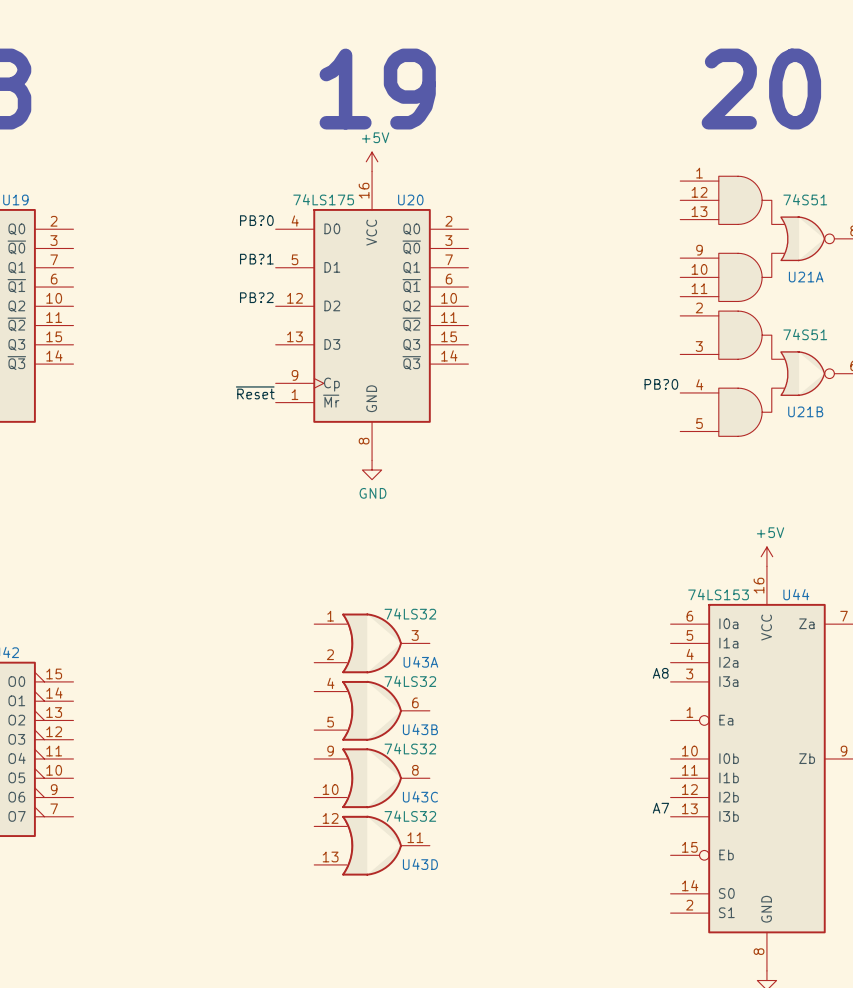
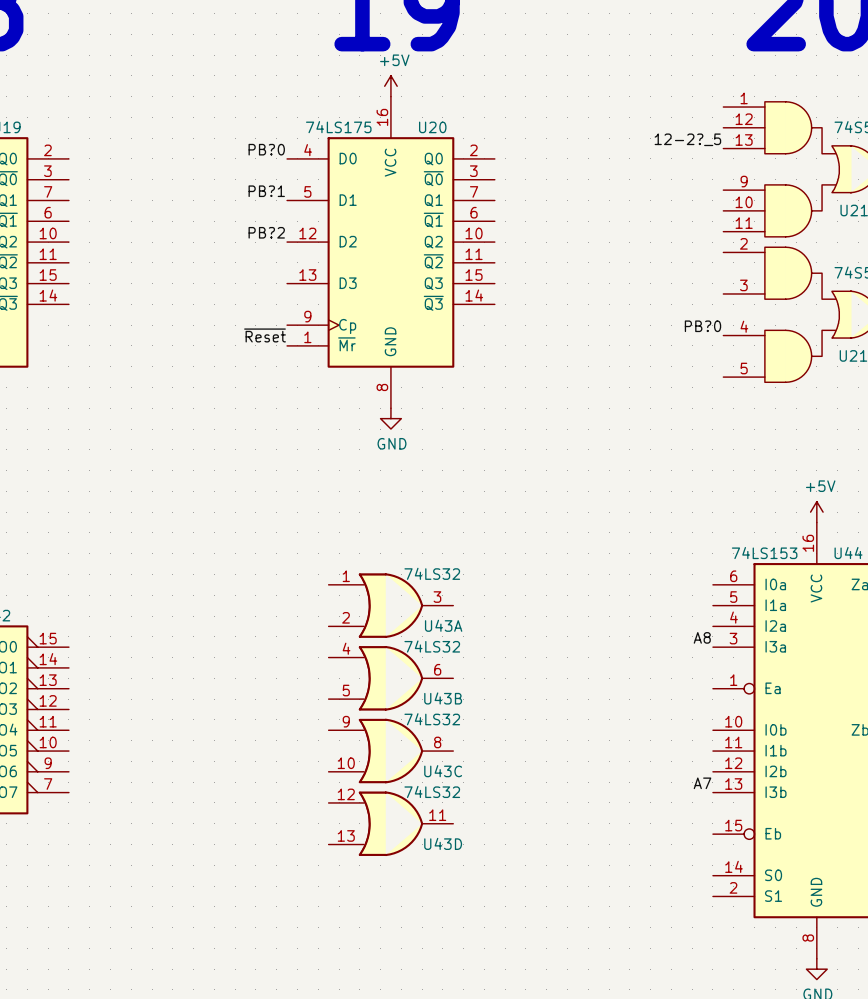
label: none -> 12-2?_5 (687, 139)

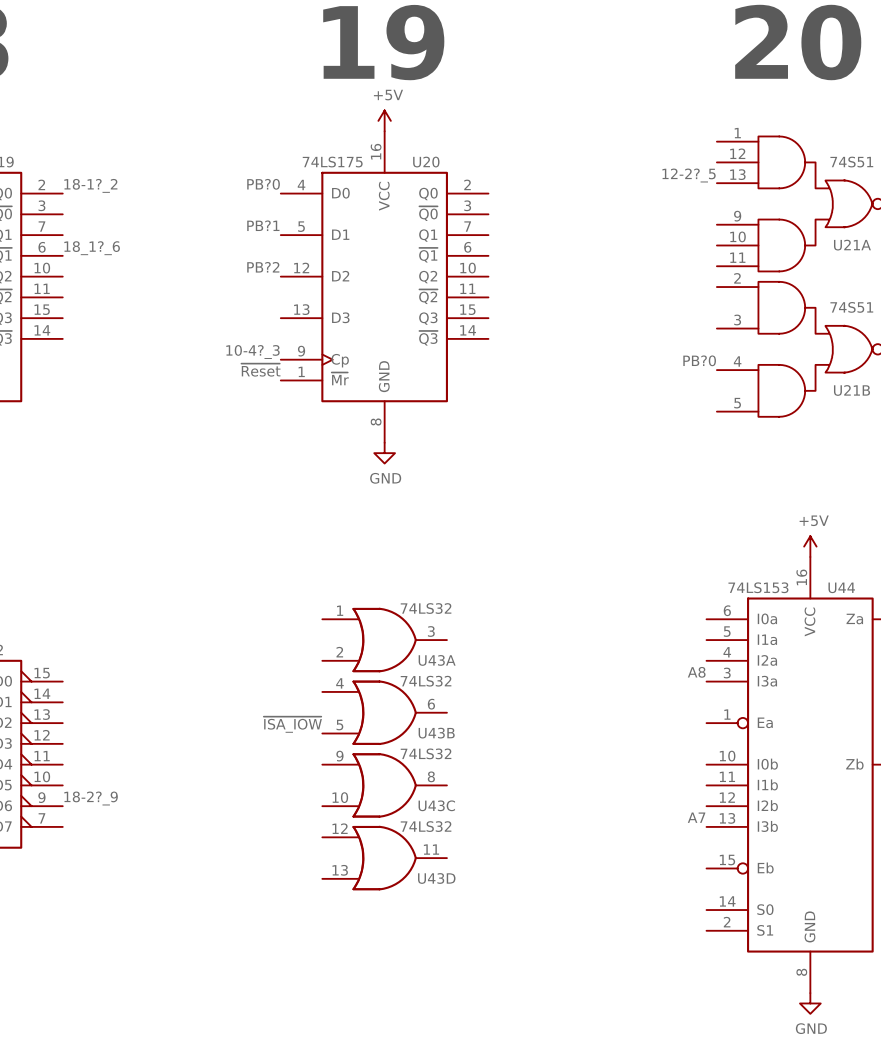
label: none -> 18-1?_2 (90, 185)
label: none -> 18_1?_6 (92, 248)
label: none -> 10-4?_3 (252, 352)
label: none -> ~{ISA_IOW} (292, 724)
label: none -> 18-2?_9 (91, 798)

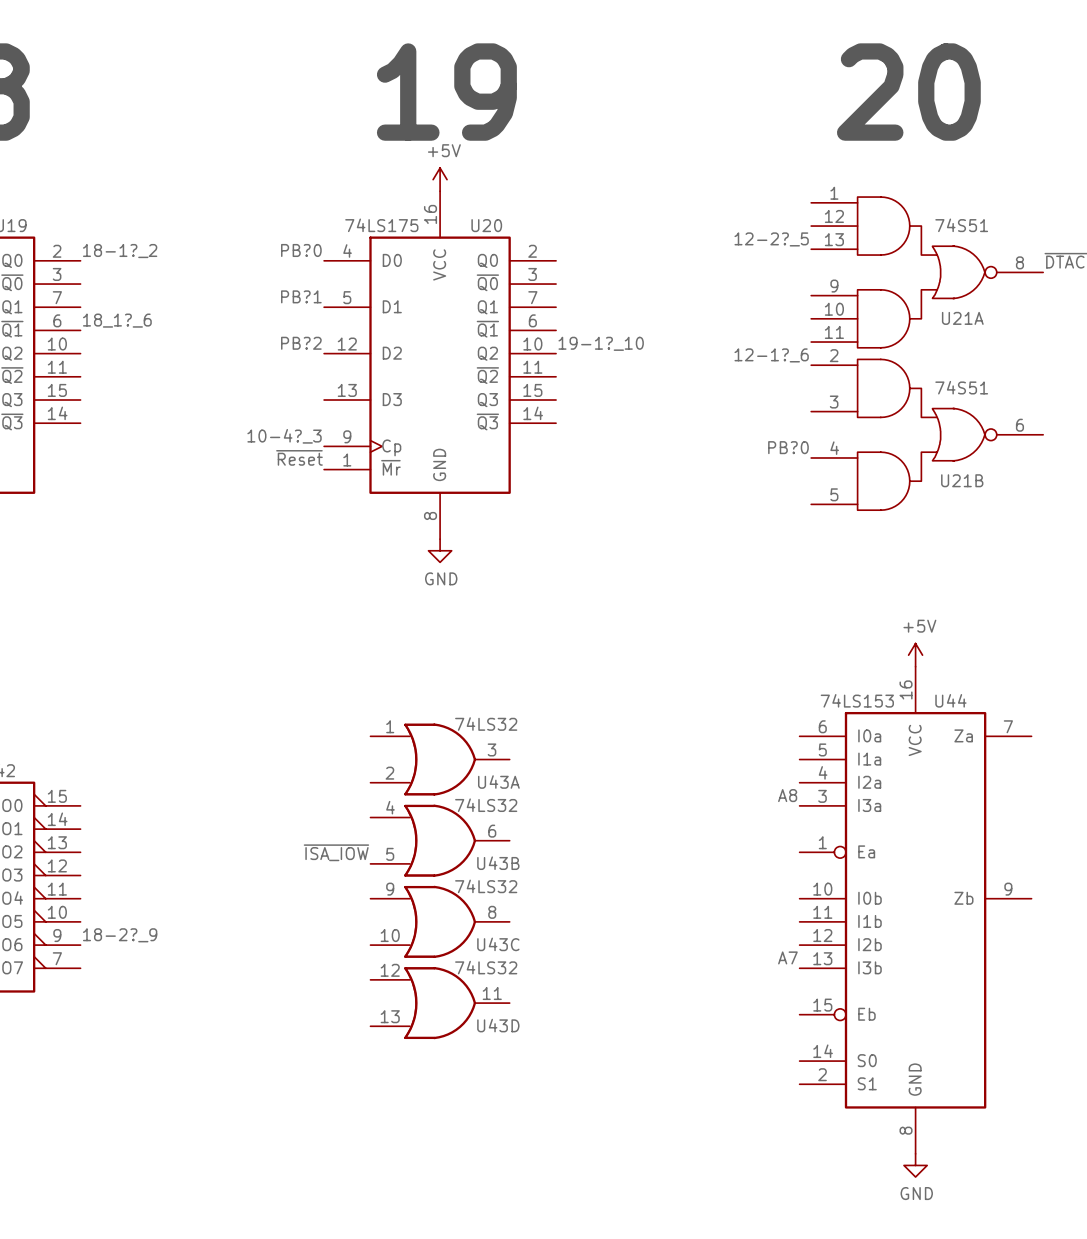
label: none -> 19-1?_10 (601, 343)
label: none -> 12-1?_6 (771, 355)

